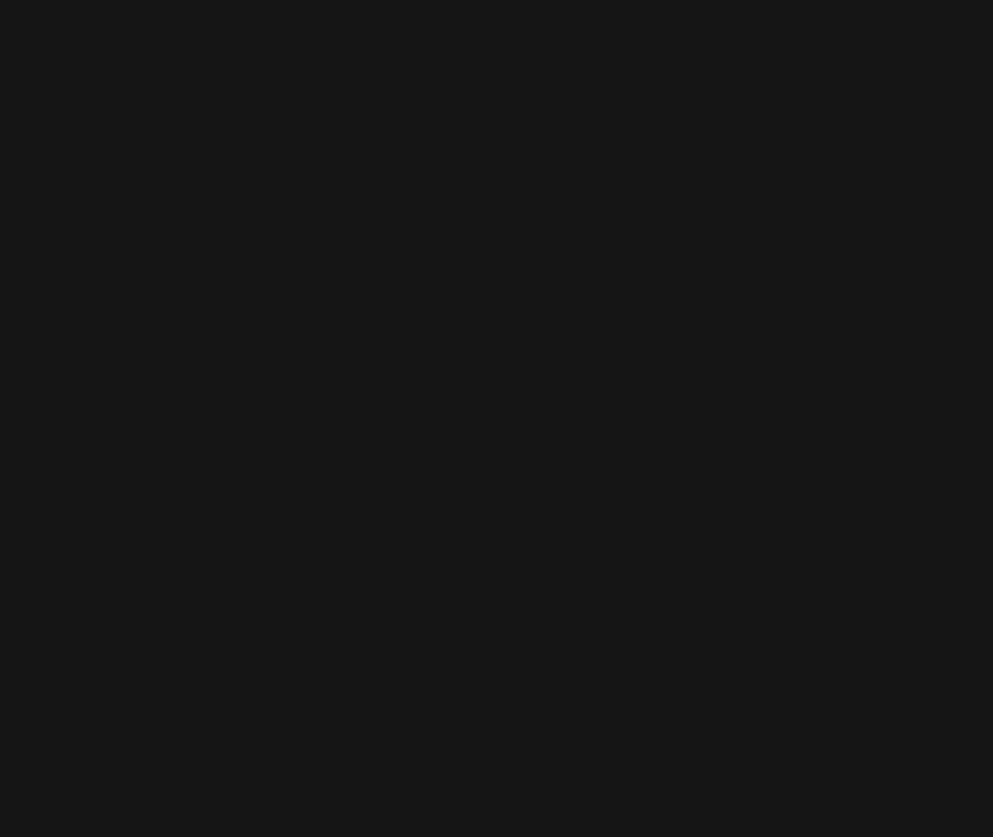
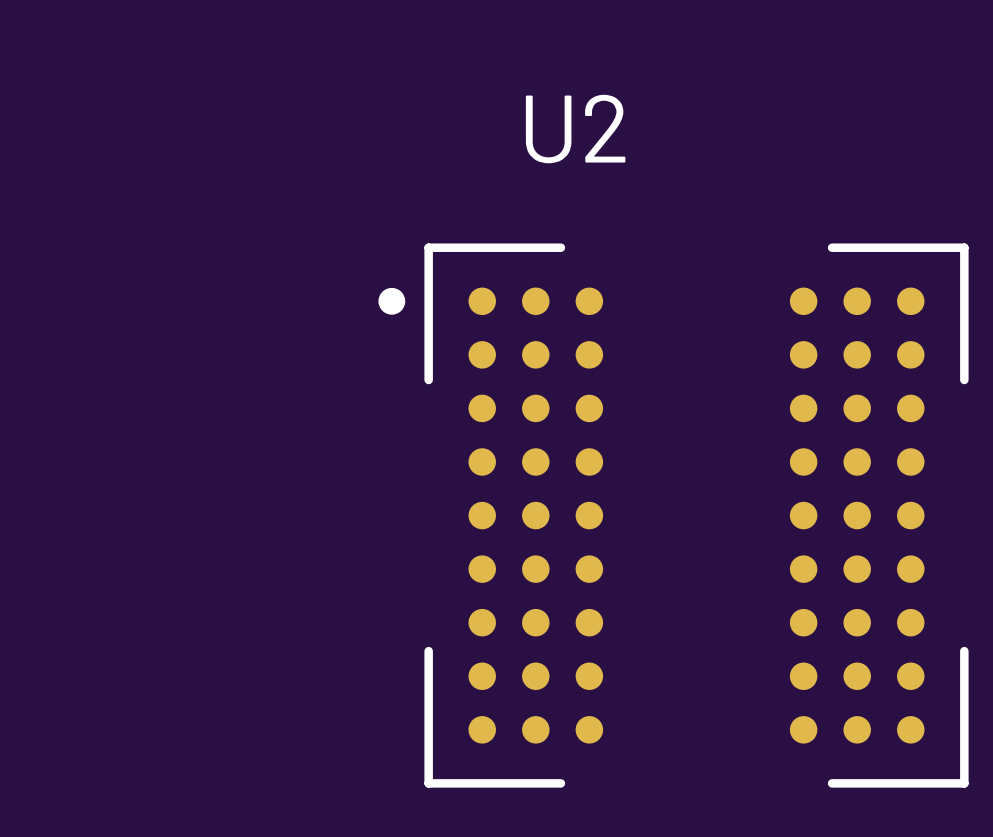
U2: none -> (673, 515)

